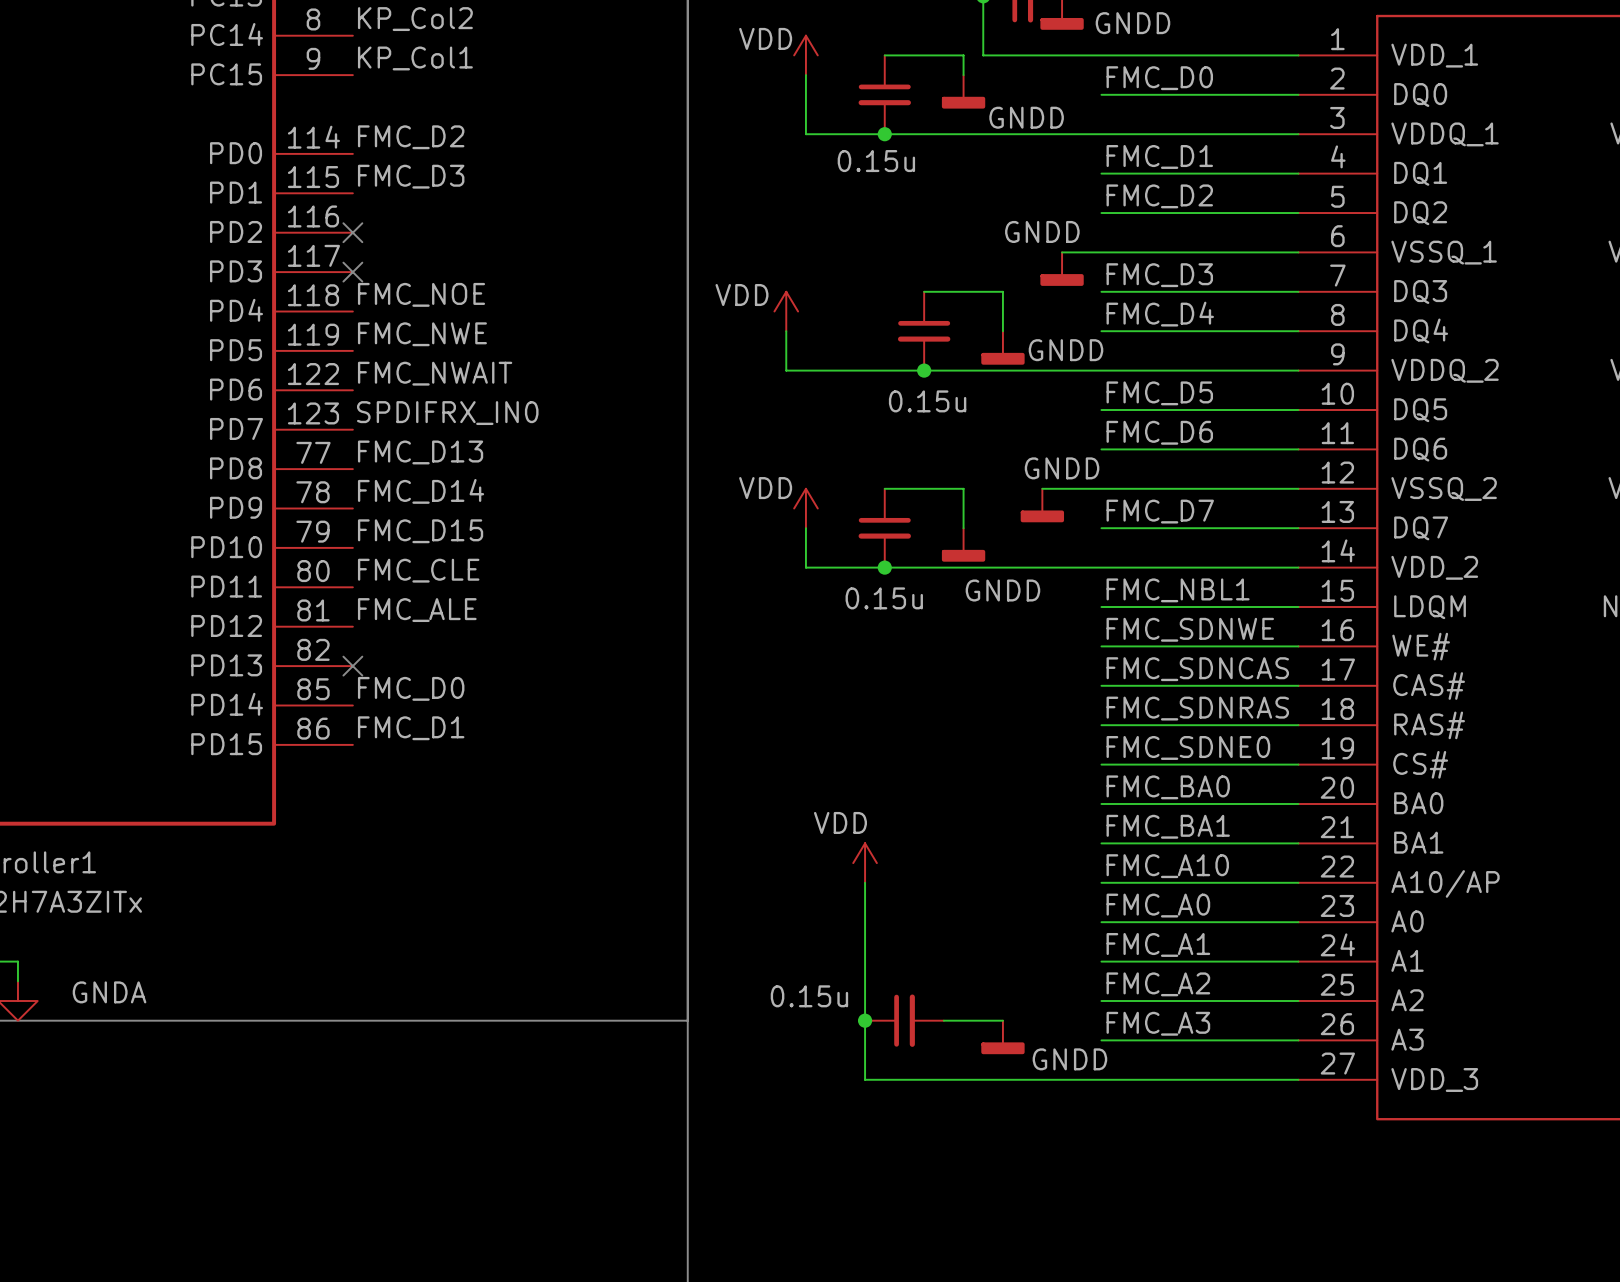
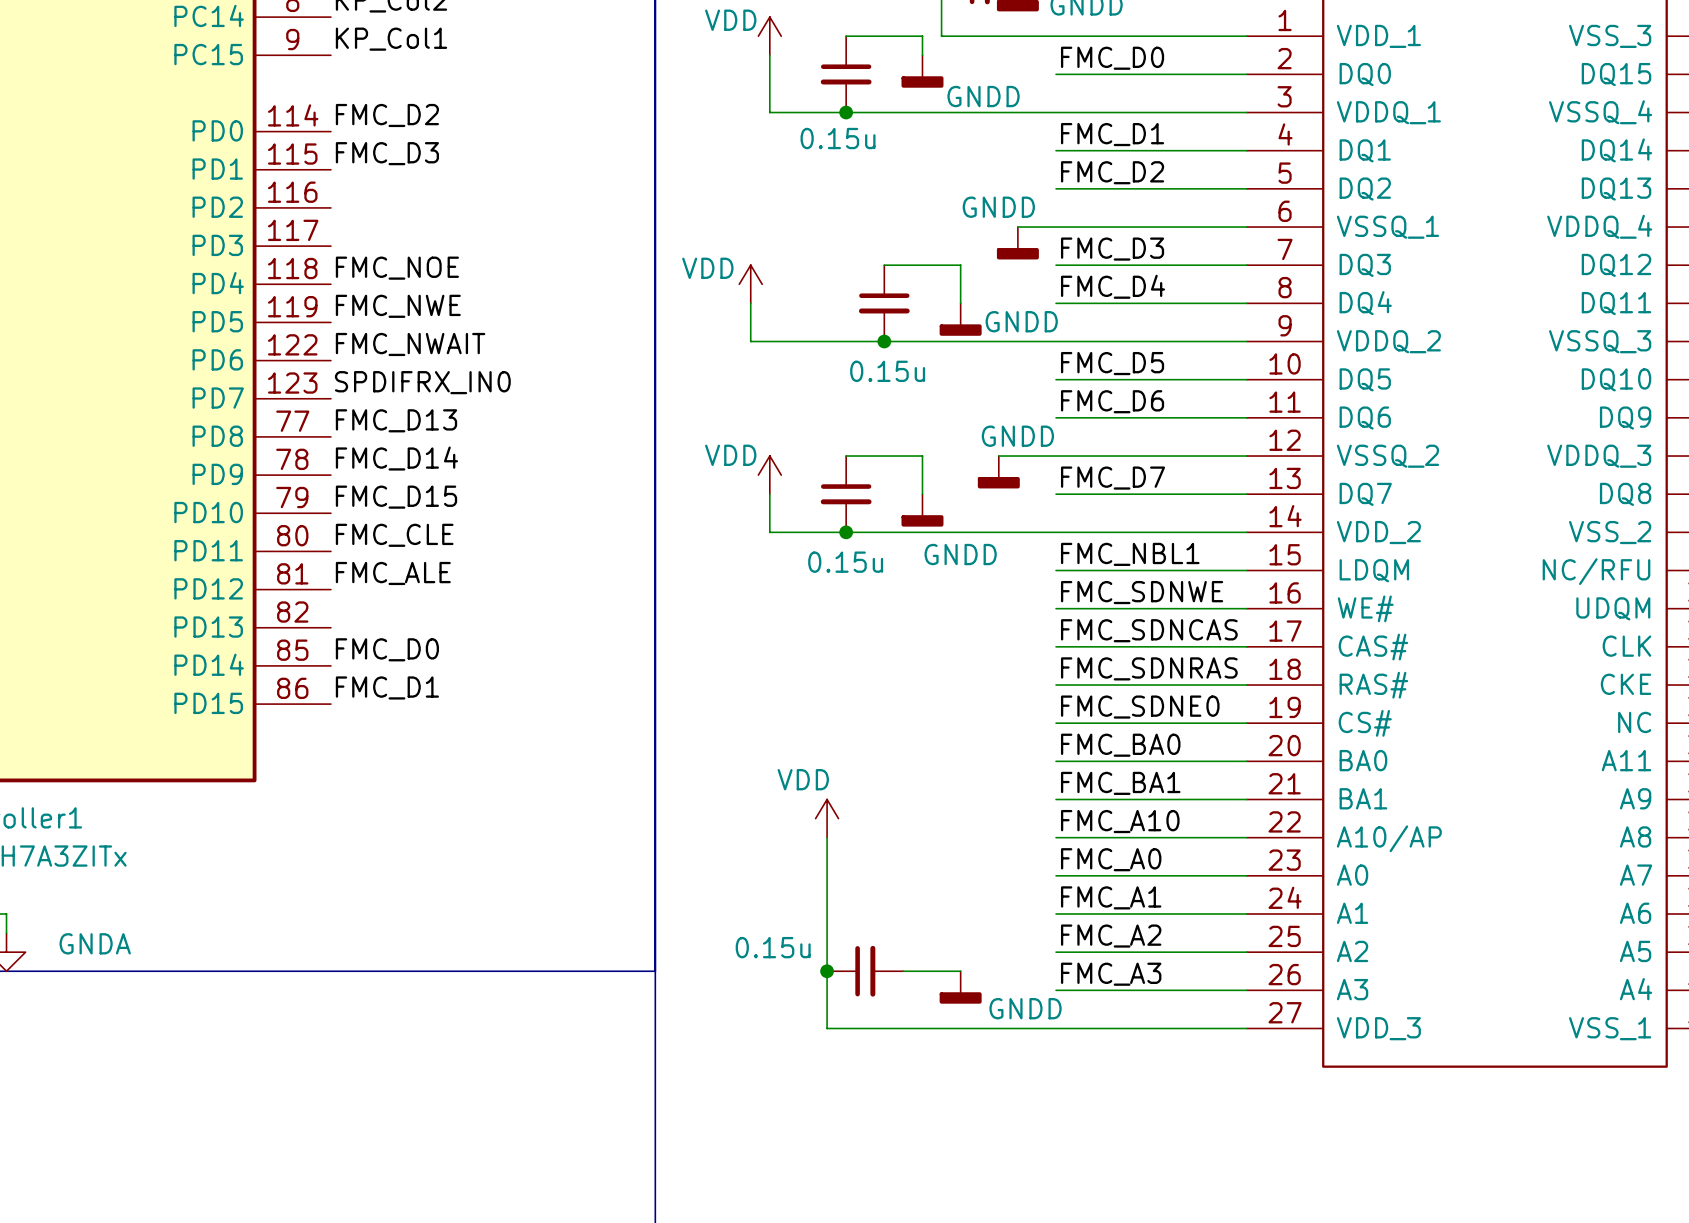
no-connect mark: (352, 232) -> none
no-connect mark: (352, 272) -> none
no-connect mark: (352, 666) -> none

